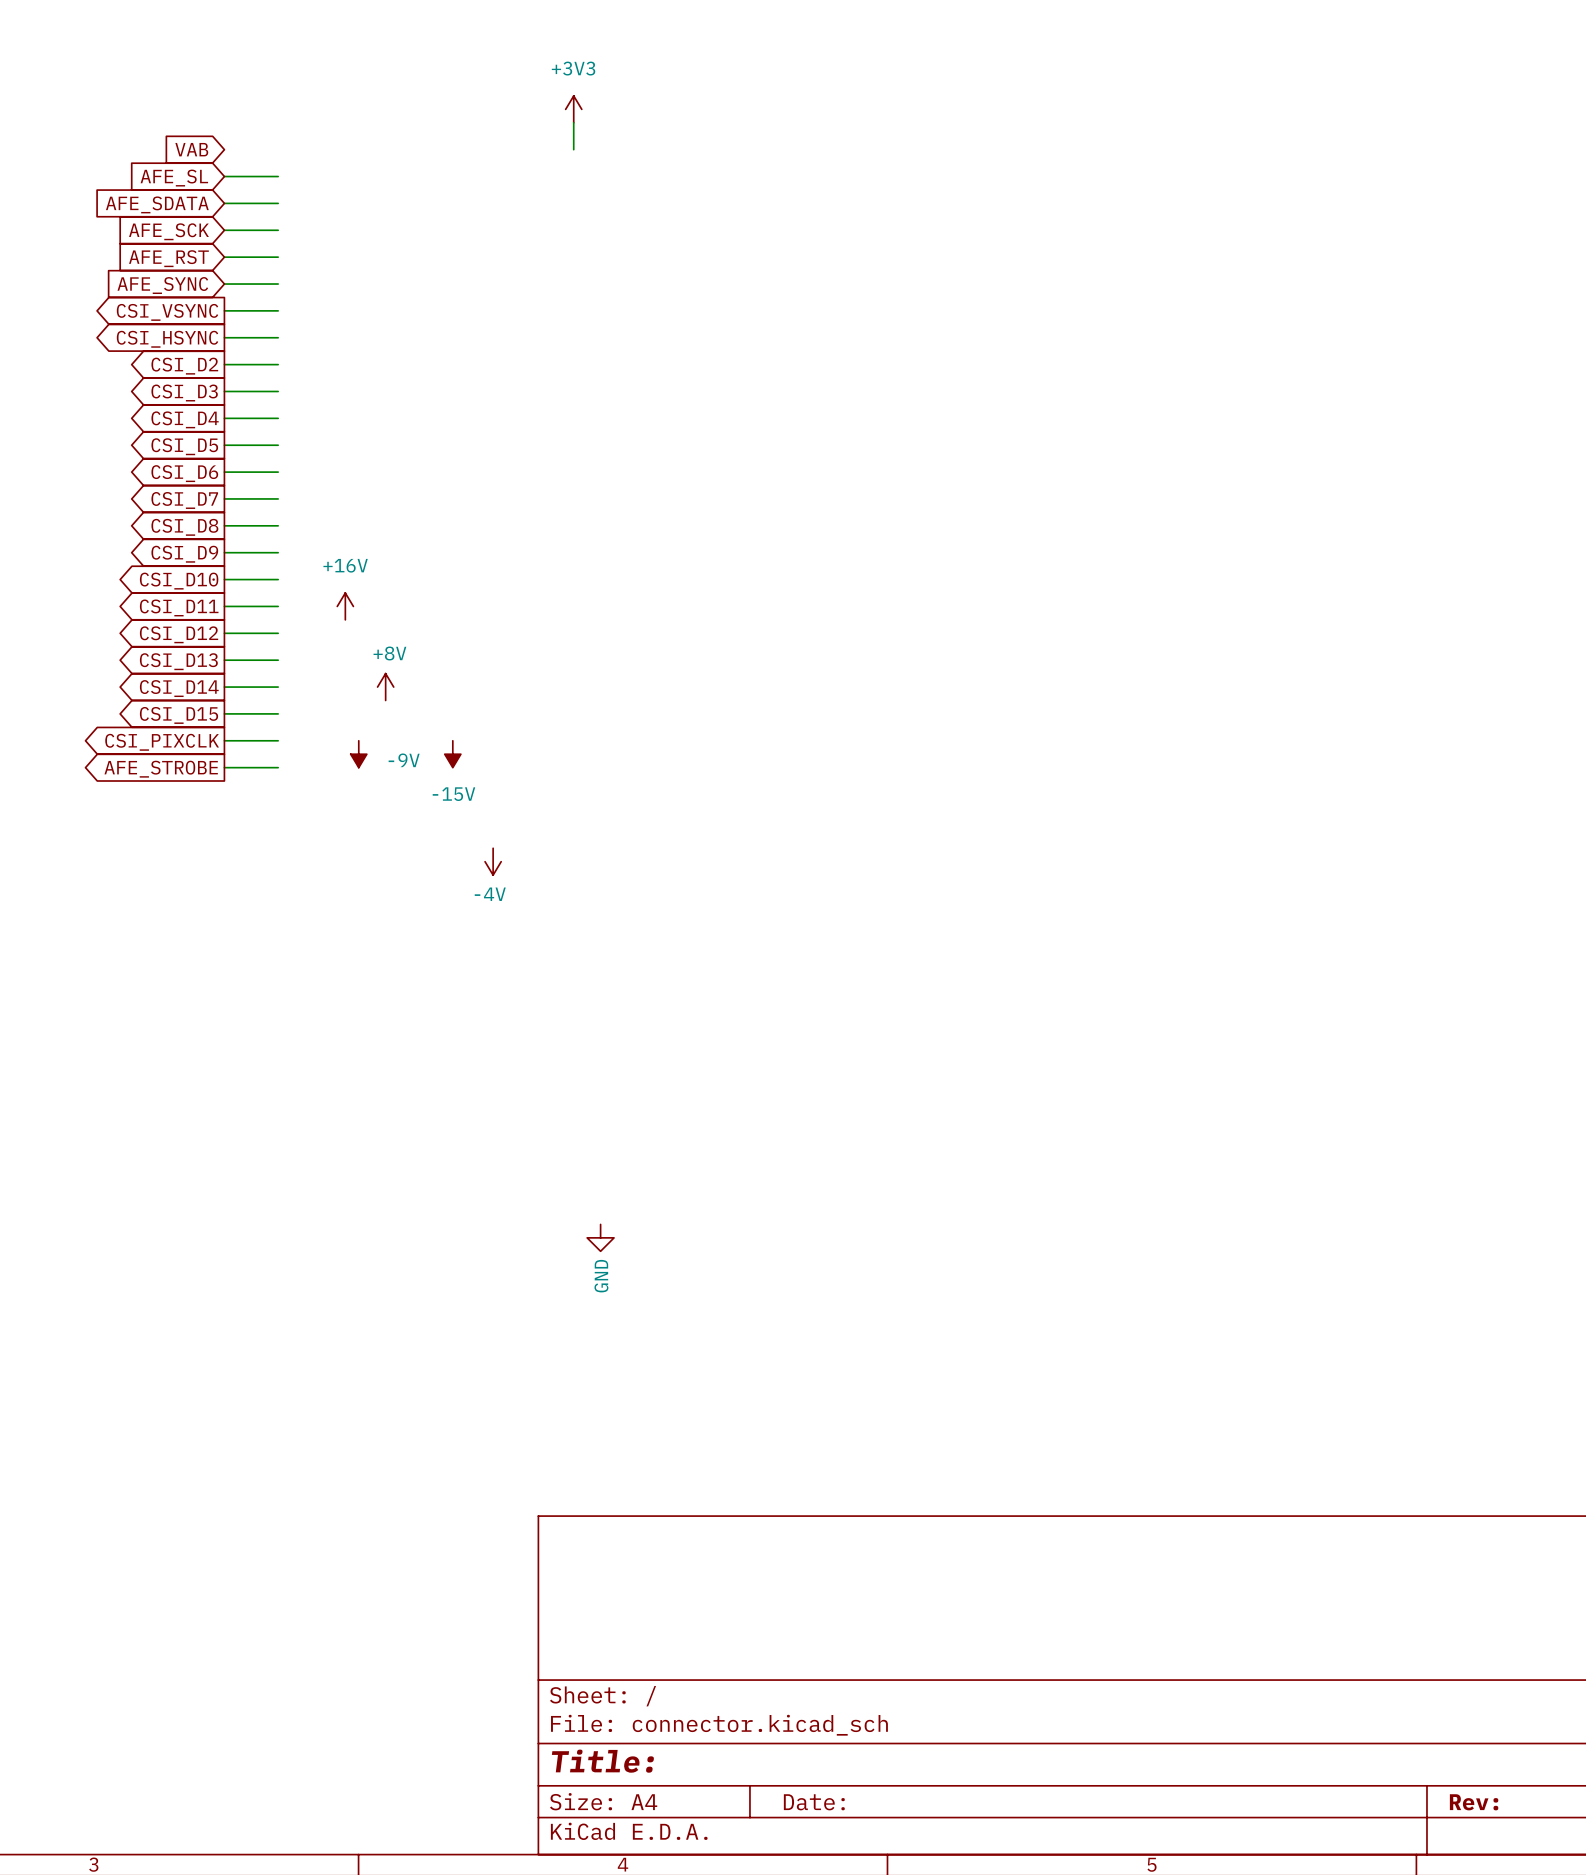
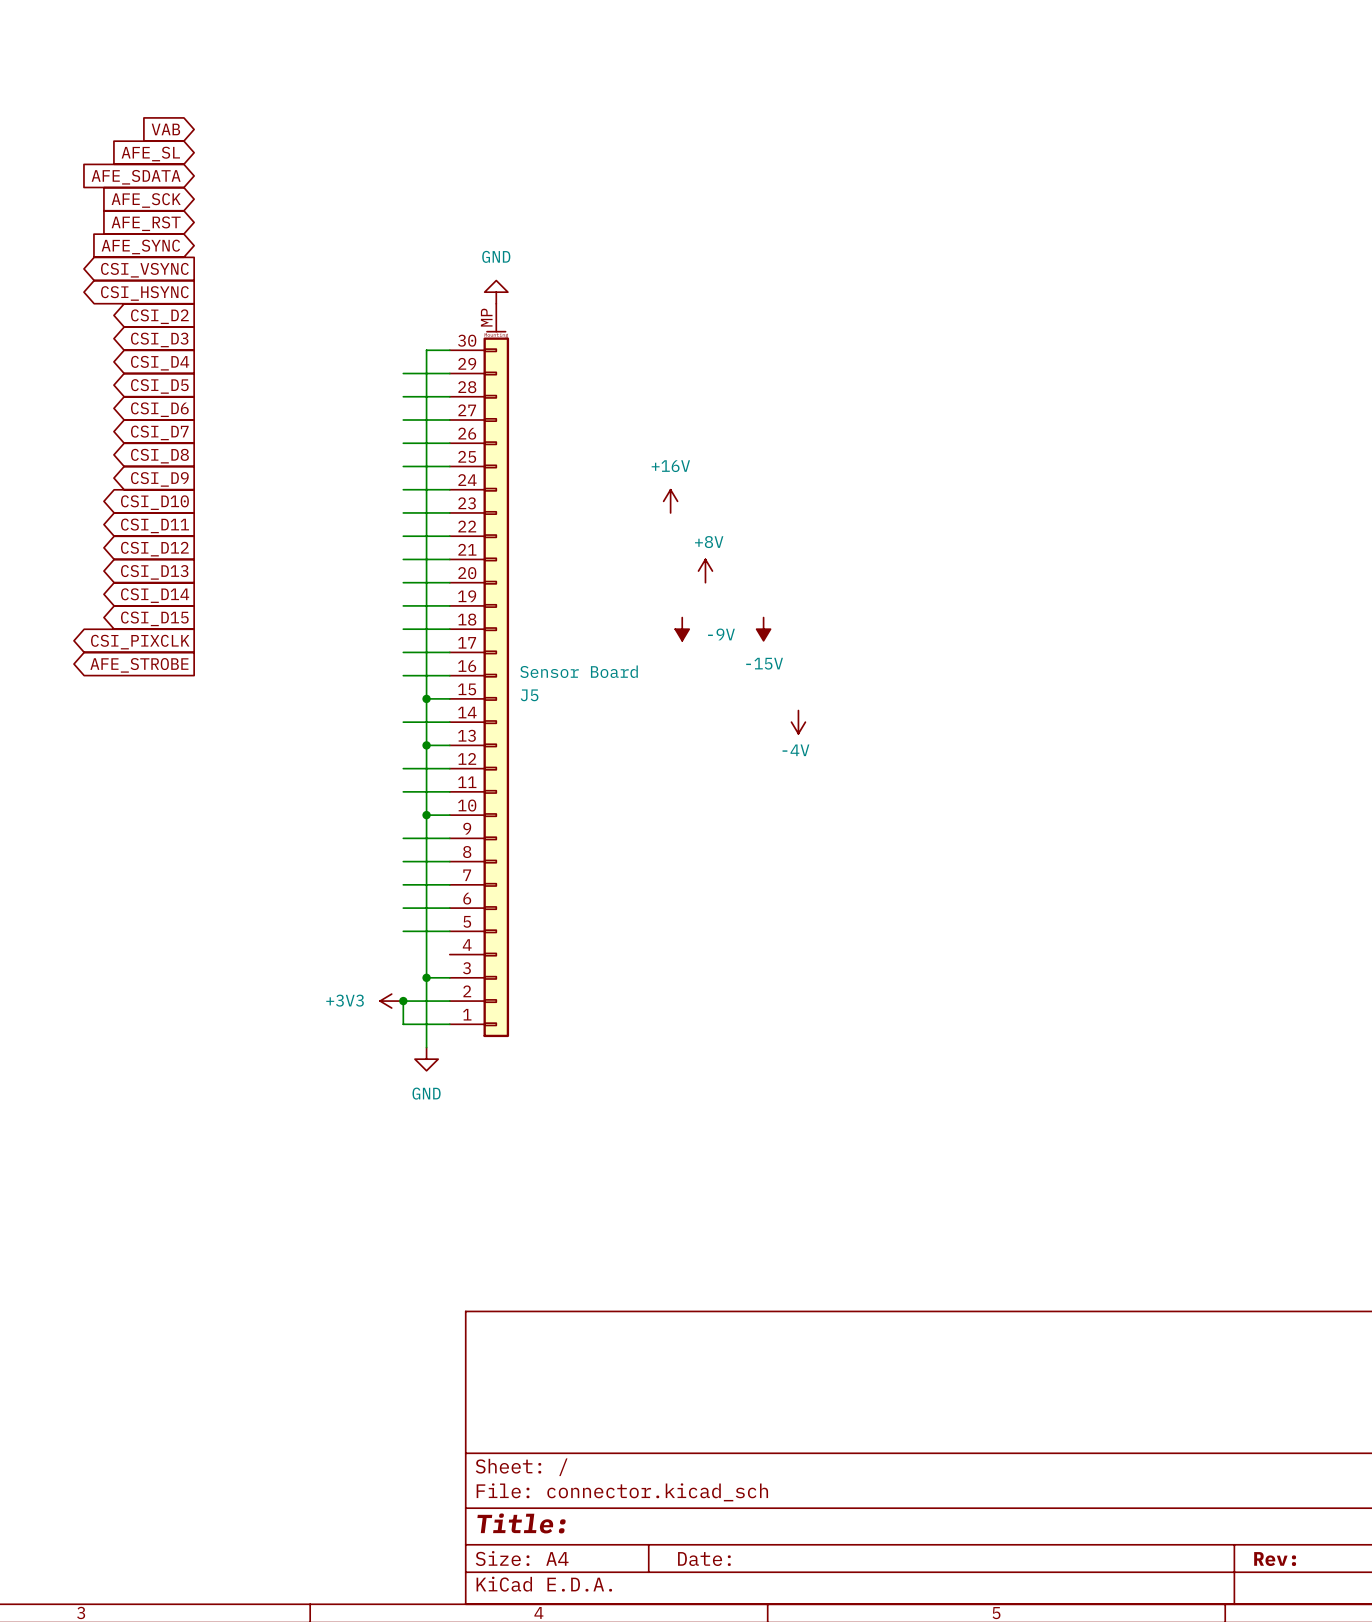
power symbol: +3V3 (573, 109) -> none
wire: (573, 122) (573, 149) -> none
wire: (224, 176) (278, 176) -> none
wire: (224, 203) (278, 203) -> none
wire: (224, 230) (278, 230) -> none
wire: (224, 257) (278, 257) -> none
wire: (224, 284) (278, 284) -> none
wire: (224, 310) (278, 310) -> none
wire: (224, 337) (278, 337) -> none
power symbol: none -> GND (496, 292)
wire: (224, 364) (278, 364) -> (403, 373) (449, 373)
wire: (224, 391) (278, 391) -> (403, 396) (449, 396)
wire: none -> (449, 350) (426, 350) (426, 1047)
wire: (224, 418) (278, 418) -> (403, 420) (449, 420)
wire: (224, 445) (278, 445) -> (403, 443) (449, 443)
wire: (224, 472) (278, 472) -> (403, 466) (449, 466)
wire: (224, 498) (278, 498) -> (403, 489) (449, 489)
wire: (224, 525) (278, 525) -> (403, 512) (449, 512)
wire: (224, 552) (278, 552) -> (403, 536) (449, 536)
wire: (224, 579) (278, 579) -> (403, 559) (449, 559)
power symbol: none -> +16V (670, 501)
wire: (224, 606) (278, 606) -> (403, 582) (449, 582)
power symbol: +16V (345, 606) -> none
wire: (224, 633) (278, 633) -> (403, 605) (449, 605)
wire: (224, 660) (278, 660) -> (403, 629) (449, 629)
power symbol: none -> +8V (705, 571)
wire: (224, 687) (278, 687) -> (403, 652) (449, 652)
power symbol: +8V (385, 687) -> none
wire: (224, 713) (278, 713) -> (403, 675) (449, 675)
power symbol: none -> -9V (682, 629)
power symbol: none -> -15V (763, 629)
wire: (224, 740) (278, 740) -> none
power symbol: -9V (358, 754) -> none
power symbol: -15V (452, 754) -> none
wire: (224, 767) (278, 767) -> (403, 722) (449, 722)
J5: none -> Sensor Board (479, 670)
wire: none -> (426, 698) (449, 698)
junction: none -> (426, 698)
power symbol: none -> -4V (798, 722)
wire: none -> (426, 745) (449, 745)
power symbol: -4V (493, 861) -> none
junction: none -> (426, 745)
wire: none -> (403, 768) (449, 768)
wire: none -> (403, 791) (449, 791)
wire: none -> (426, 815) (449, 815)
junction: none -> (426, 815)
wire: none -> (403, 838) (449, 838)
wire: none -> (403, 861) (449, 861)
wire: none -> (403, 884) (449, 884)
wire: none -> (403, 908) (449, 908)
wire: none -> (403, 931) (449, 931)
wire: none -> (426, 977) (449, 977)
junction: none -> (426, 977)
power symbol: none -> +3V3 (391, 1001)
junction: none -> (403, 1001)
wire: none -> (449, 1001) (403, 1001) (403, 1024) (449, 1024)
power symbol position: GND (600, 1237) -> GND (426, 1059)
power symbol text rotation: 0° (601, 1276) -> 90° clockwise (426, 1093)

